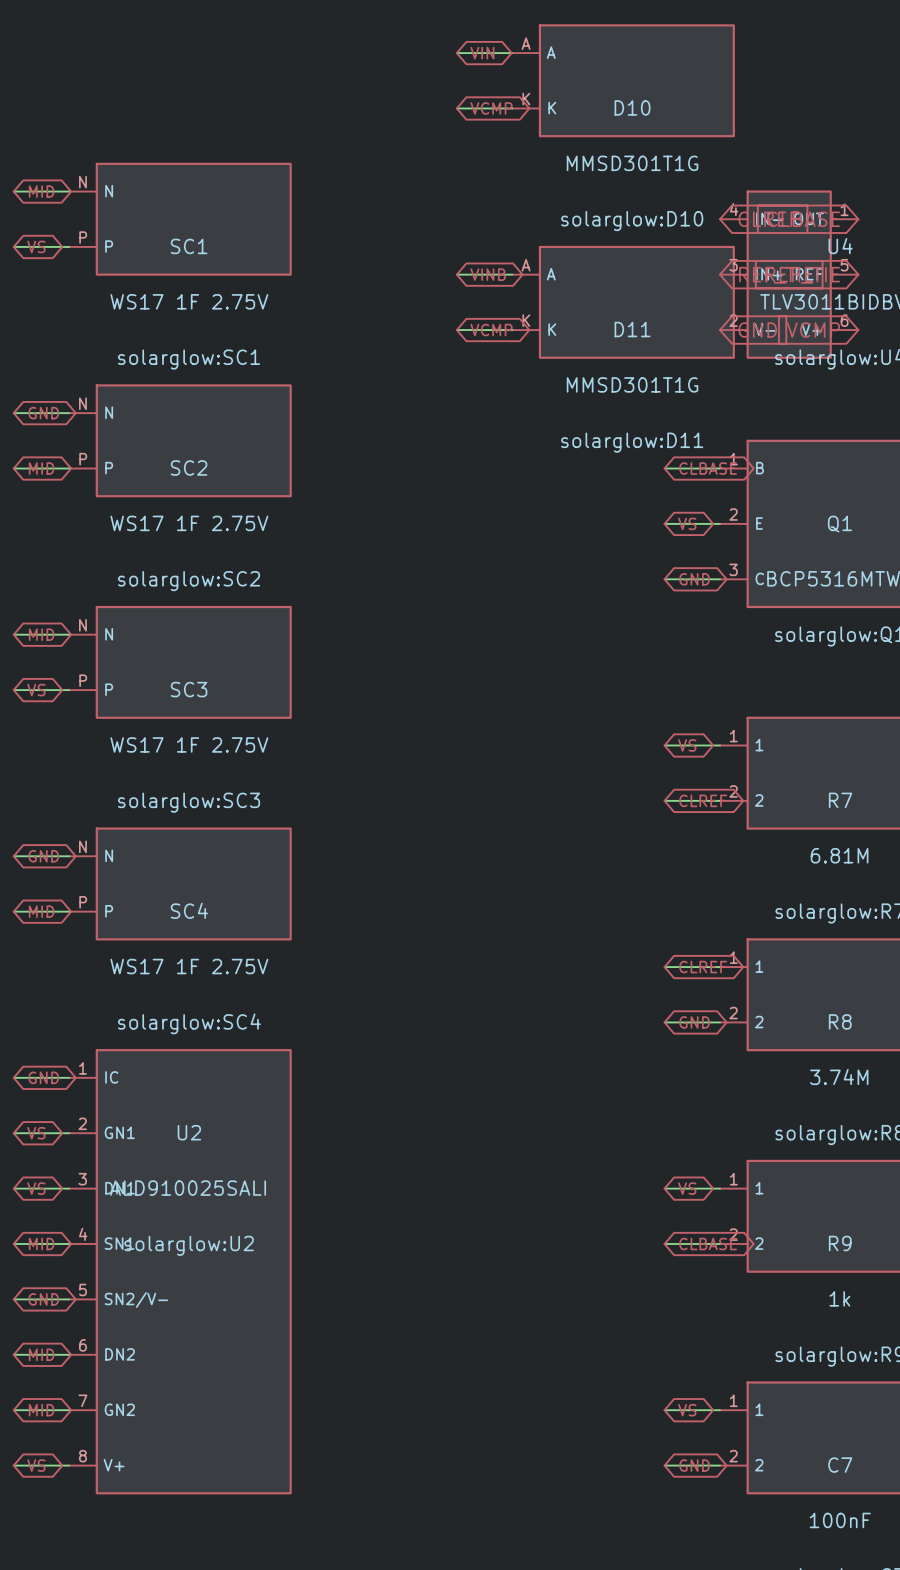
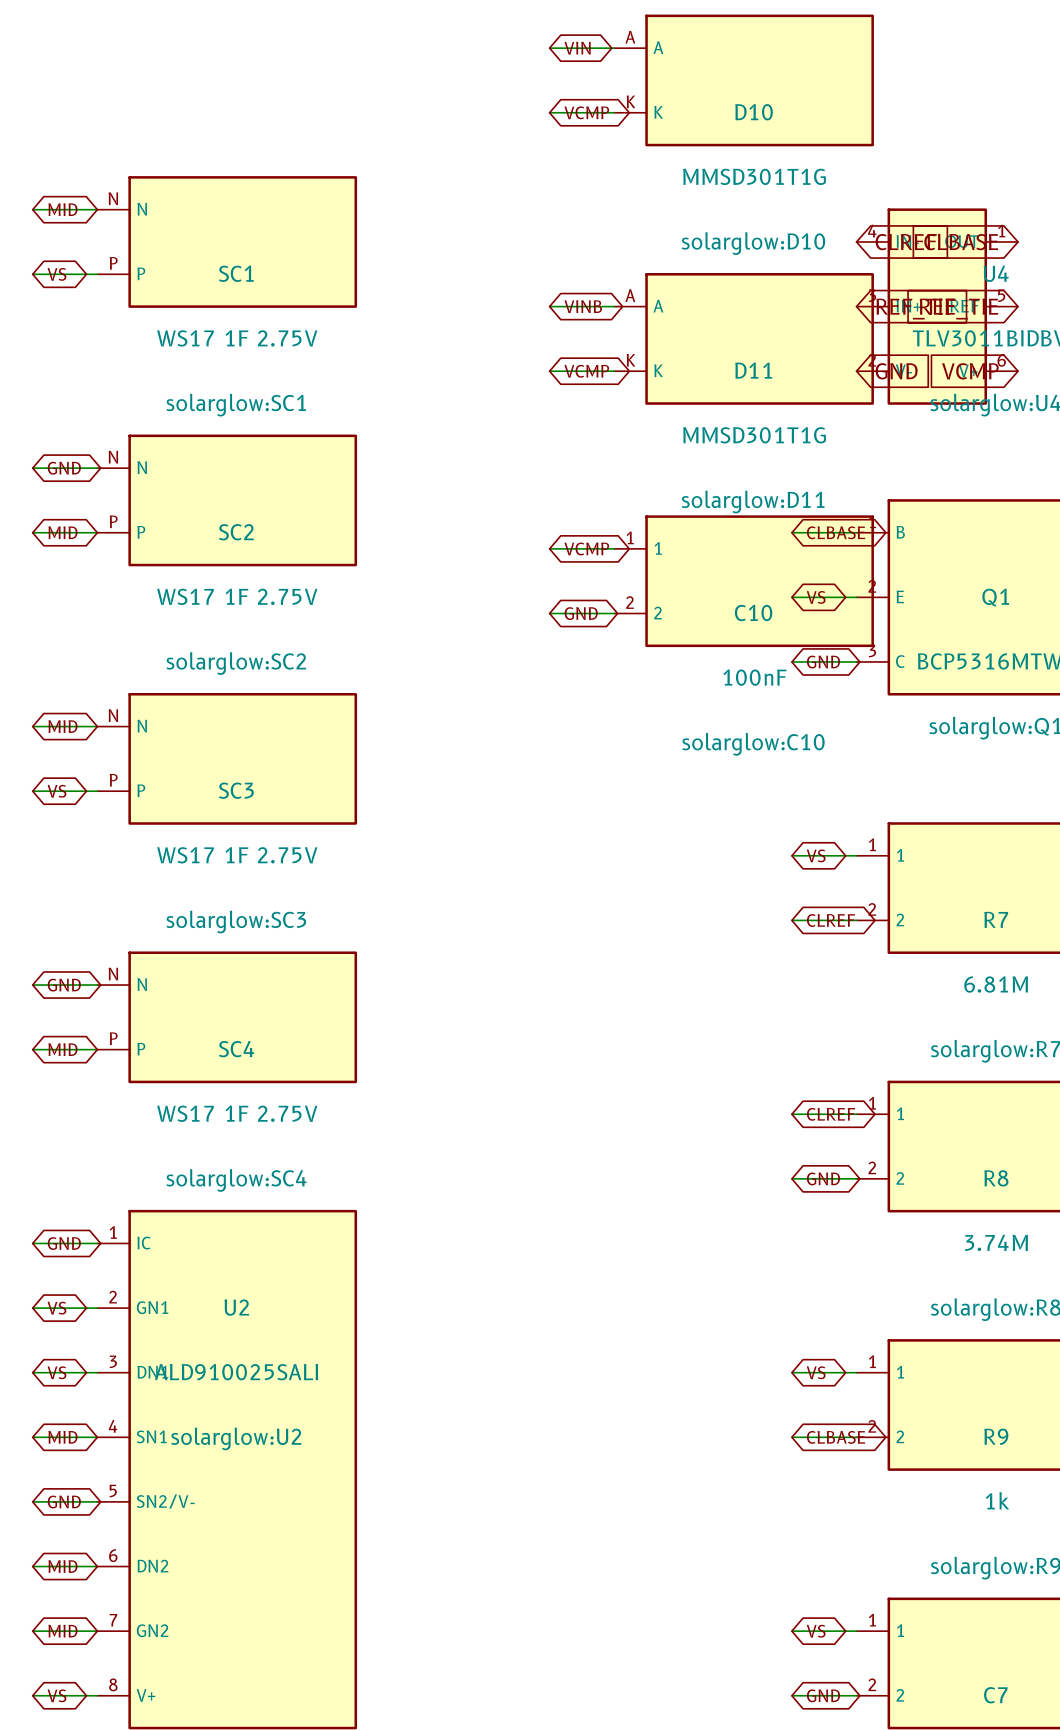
wire: none -> (549, 548) (614, 548)
global label: none -> VCMP (586, 548)
C10: none -> 100nF (744, 581)
wire: none -> (549, 613) (614, 613)
global label: none -> GND (581, 613)

